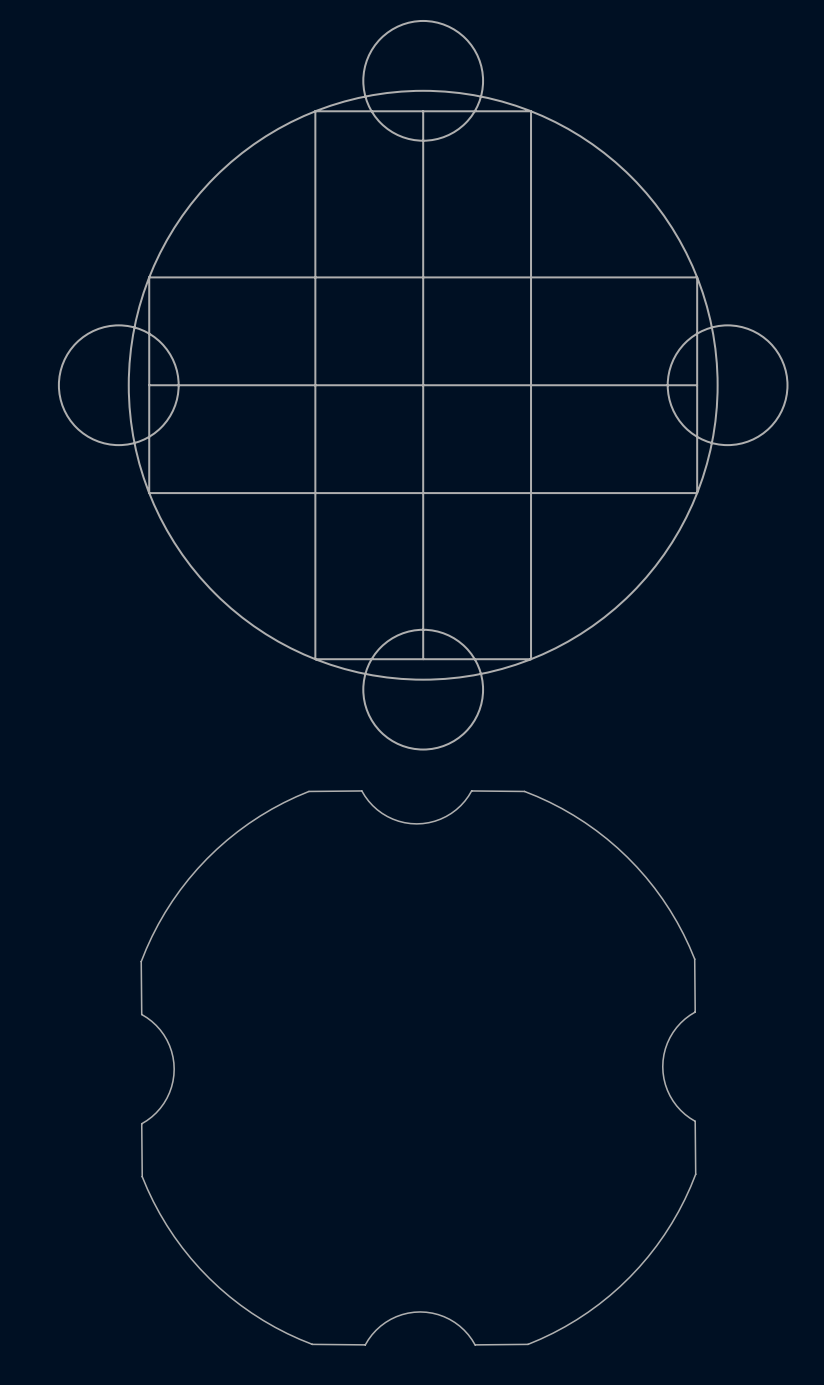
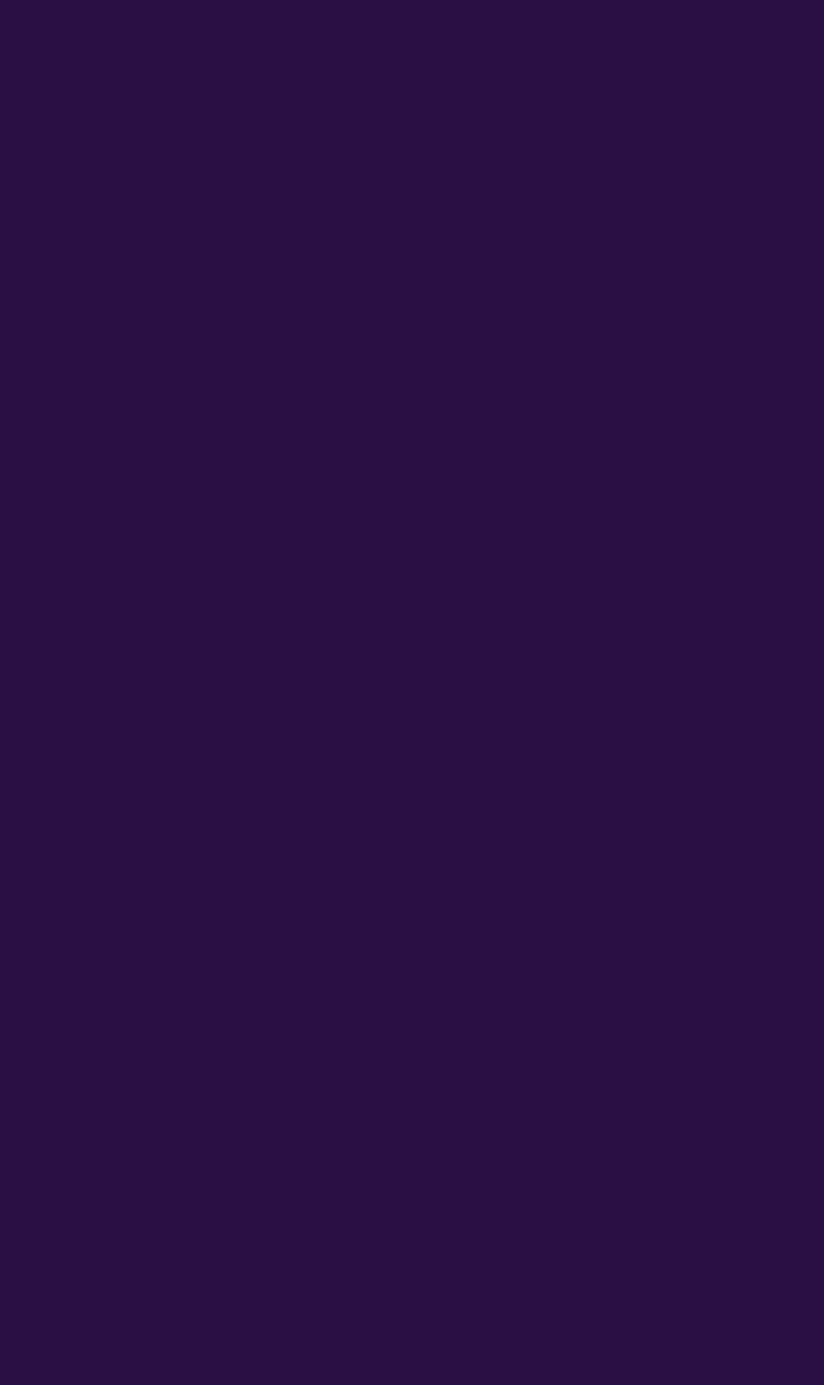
drawing: [57, 19, 789, 751] -> none
line: (315, 111) (531, 111) (531, 659) (315, 659) (315, 111) -> none
line: (423, 111) (423, 659) -> none
line: (149, 277) (697, 277) (697, 493) (149, 493) (149, 277) -> none
line: (149, 385) (697, 385) -> none
line: (361, 790) (308, 791) (260, 816) (237, 831) (207, 858) (180, 889) (158, 924) (141, 961) (141, 1014) (156, 1025) (166, 1040) (172, 1057) (173, 1075) (171, 1087) (163, 1103) (156, 1112) (141, 1123) (142, 1176) (166, 1225) (200, 1268) (240, 1305) (263, 1320) (299, 1339) (312, 1344) (365, 1344) (376, 1330) (390, 1319) (408, 1313) (420, 1311) (438, 1314) (454, 1322) (468, 1334) (475, 1344) (528, 1344) (576, 1319) (620, 1286) (656, 1245) (678, 1211) (690, 1186) (695, 1174) (695, 1121) (680, 1110) (670, 1095) (665, 1084) (662, 1066) (665, 1048) (673, 1032) (685, 1018) (695, 1012) (694, 959) (670, 910) (636, 867) (596, 830) (549, 802) (524, 791) (471, 790) (460, 805) (446, 816) (428, 822) (410, 823) (392, 819) (382, 813) (372, 805) (368, 801) (364, 796) (361, 790) -> none

